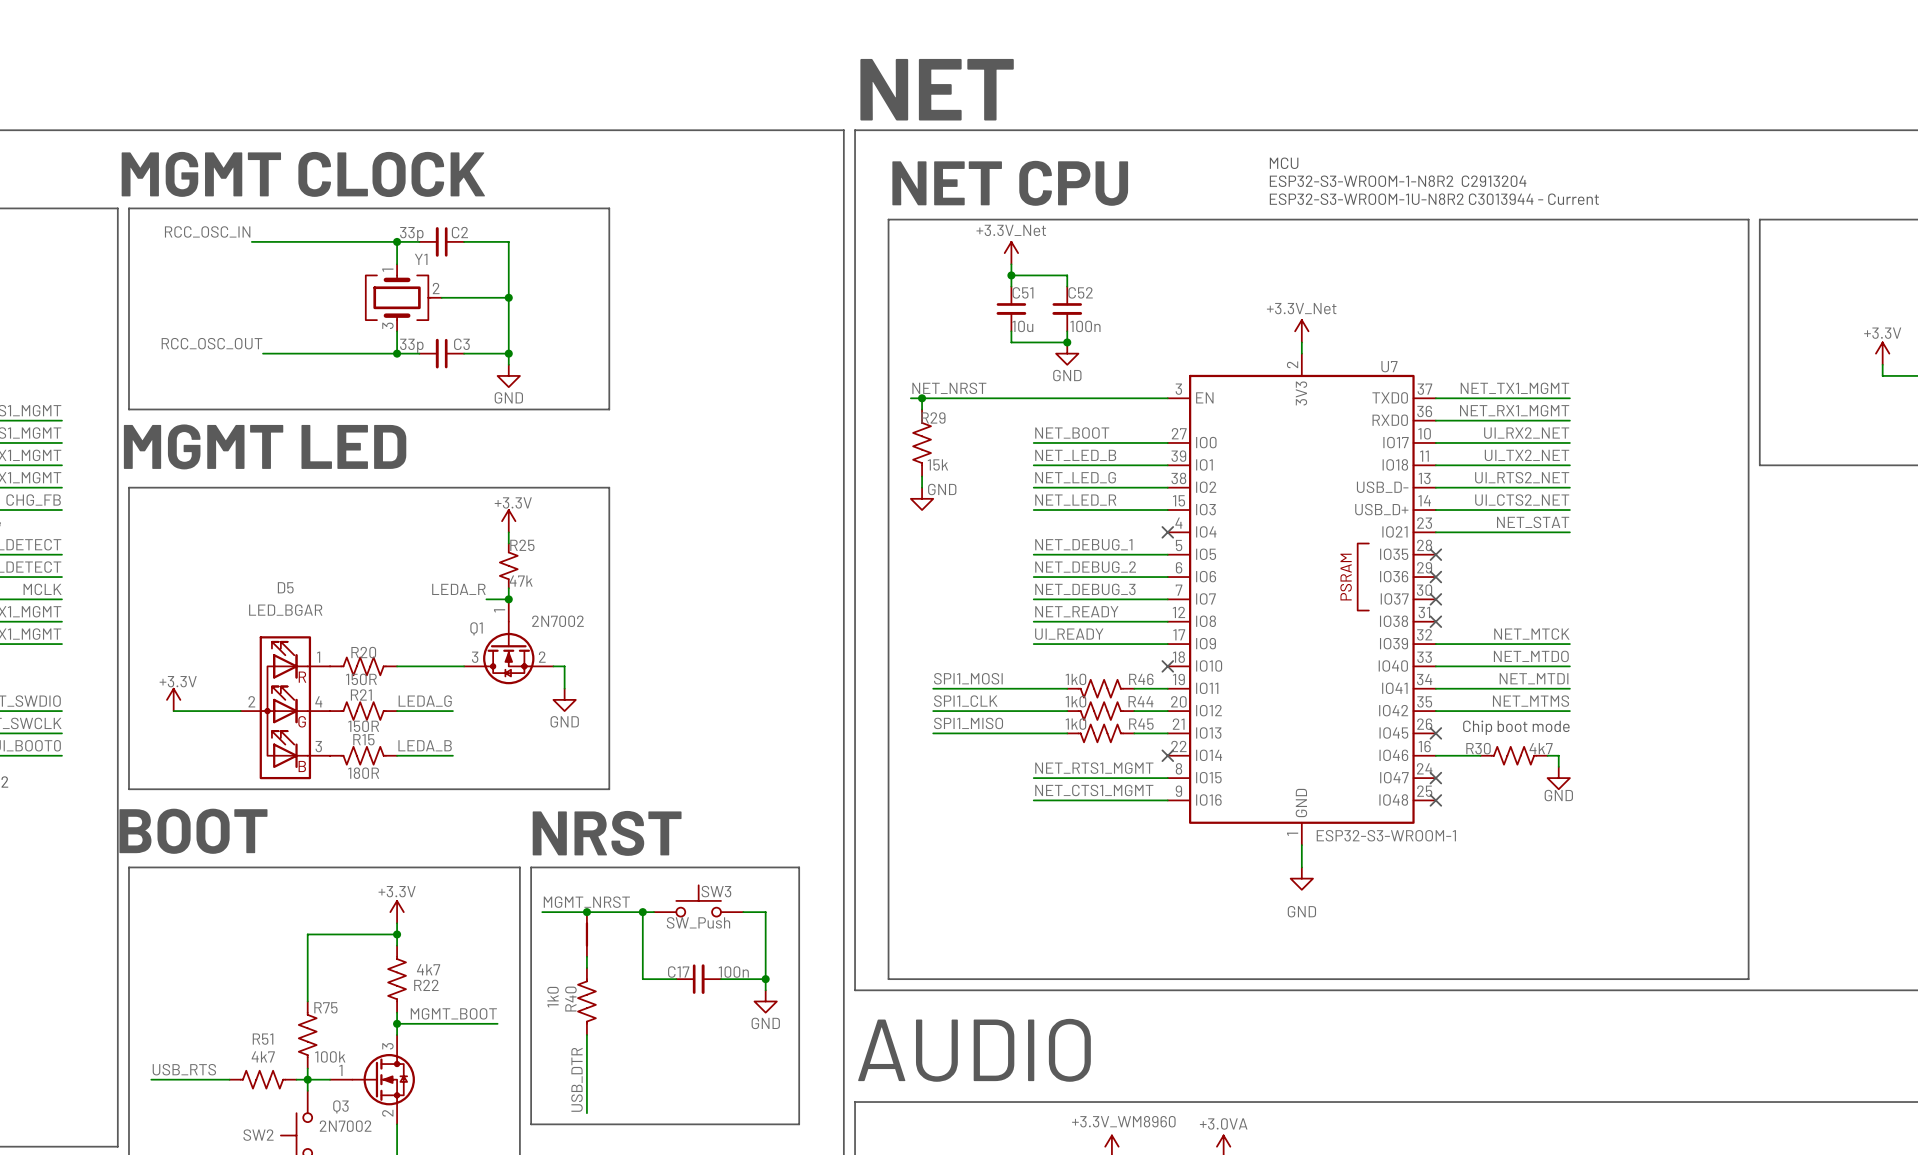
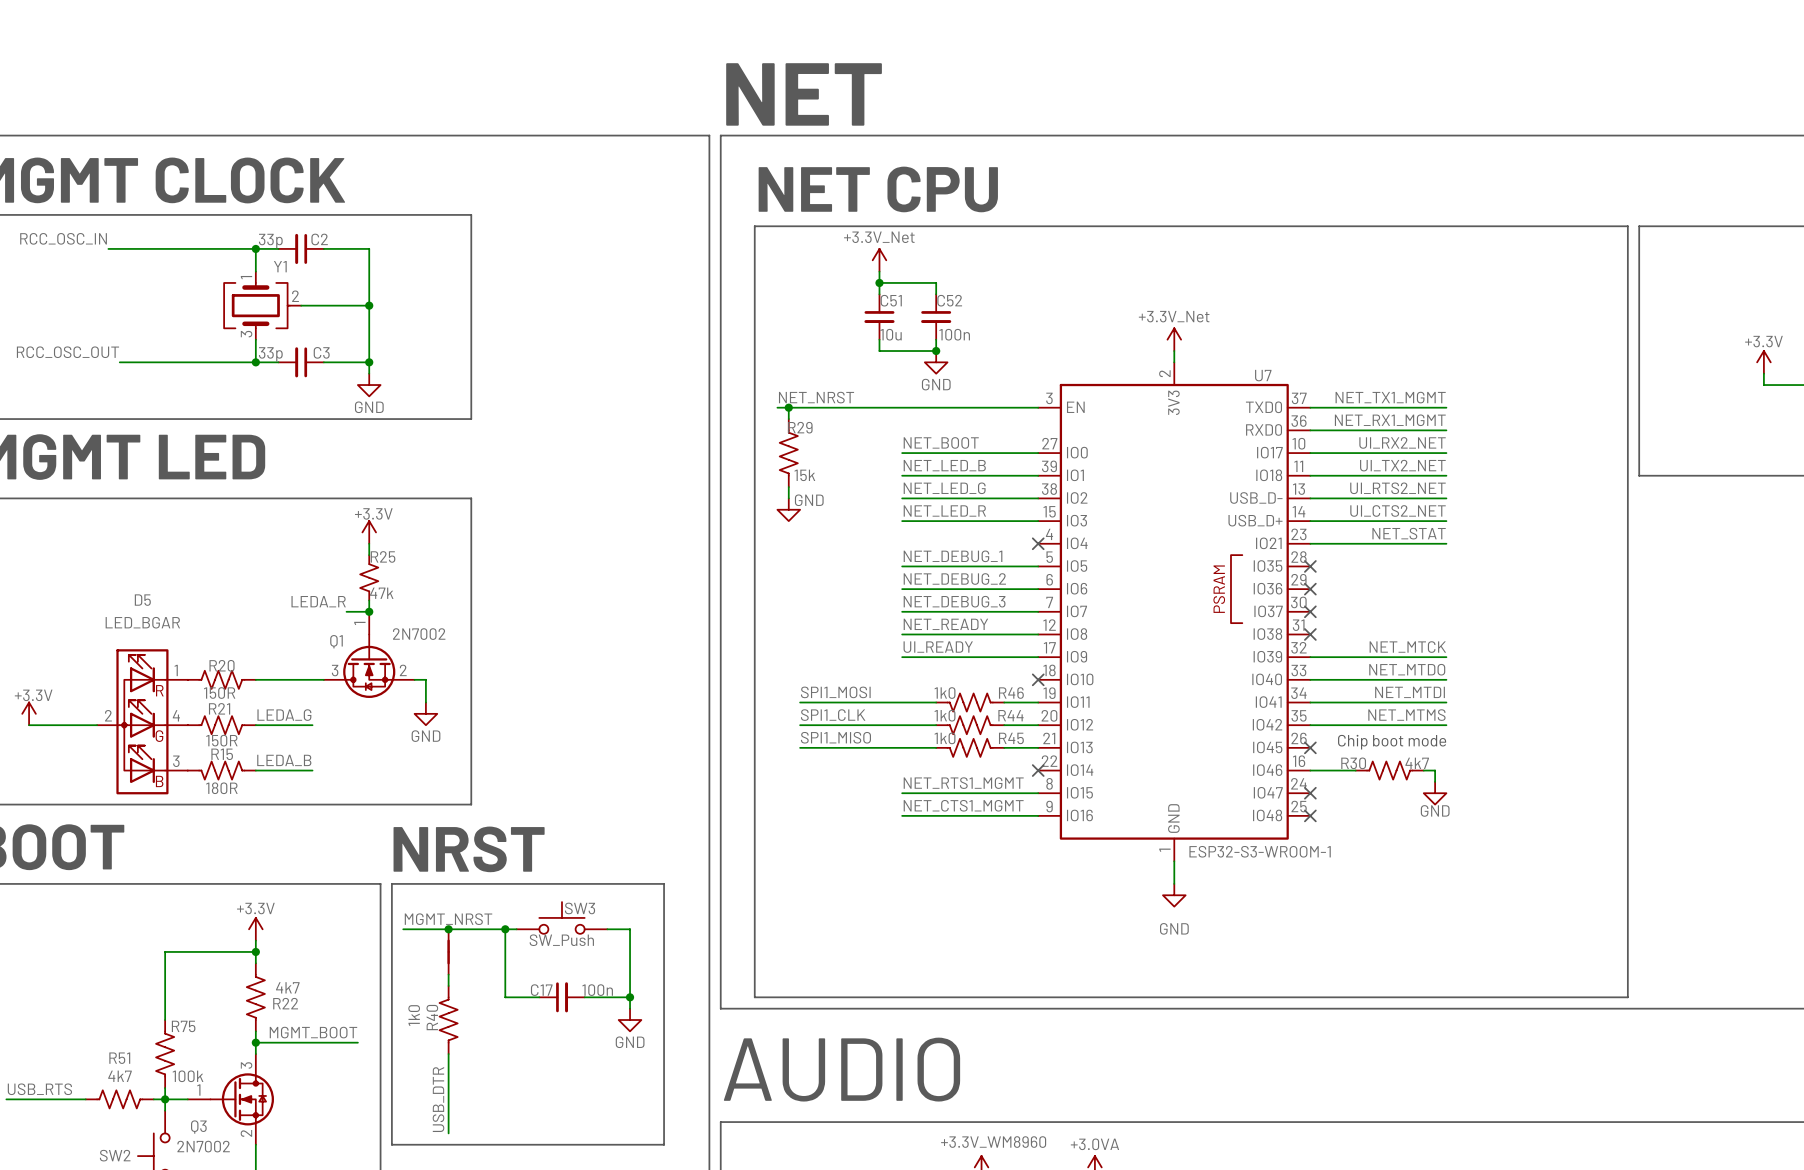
text: MCU (1284, 163) -> none
text: ESP32-S3-WROOM-1-N8R2 C2913204 (1398, 181) -> none
text: ESP32-S3-WROOM-1U-N8R2 C3013944 - Current (1434, 199) -> none

